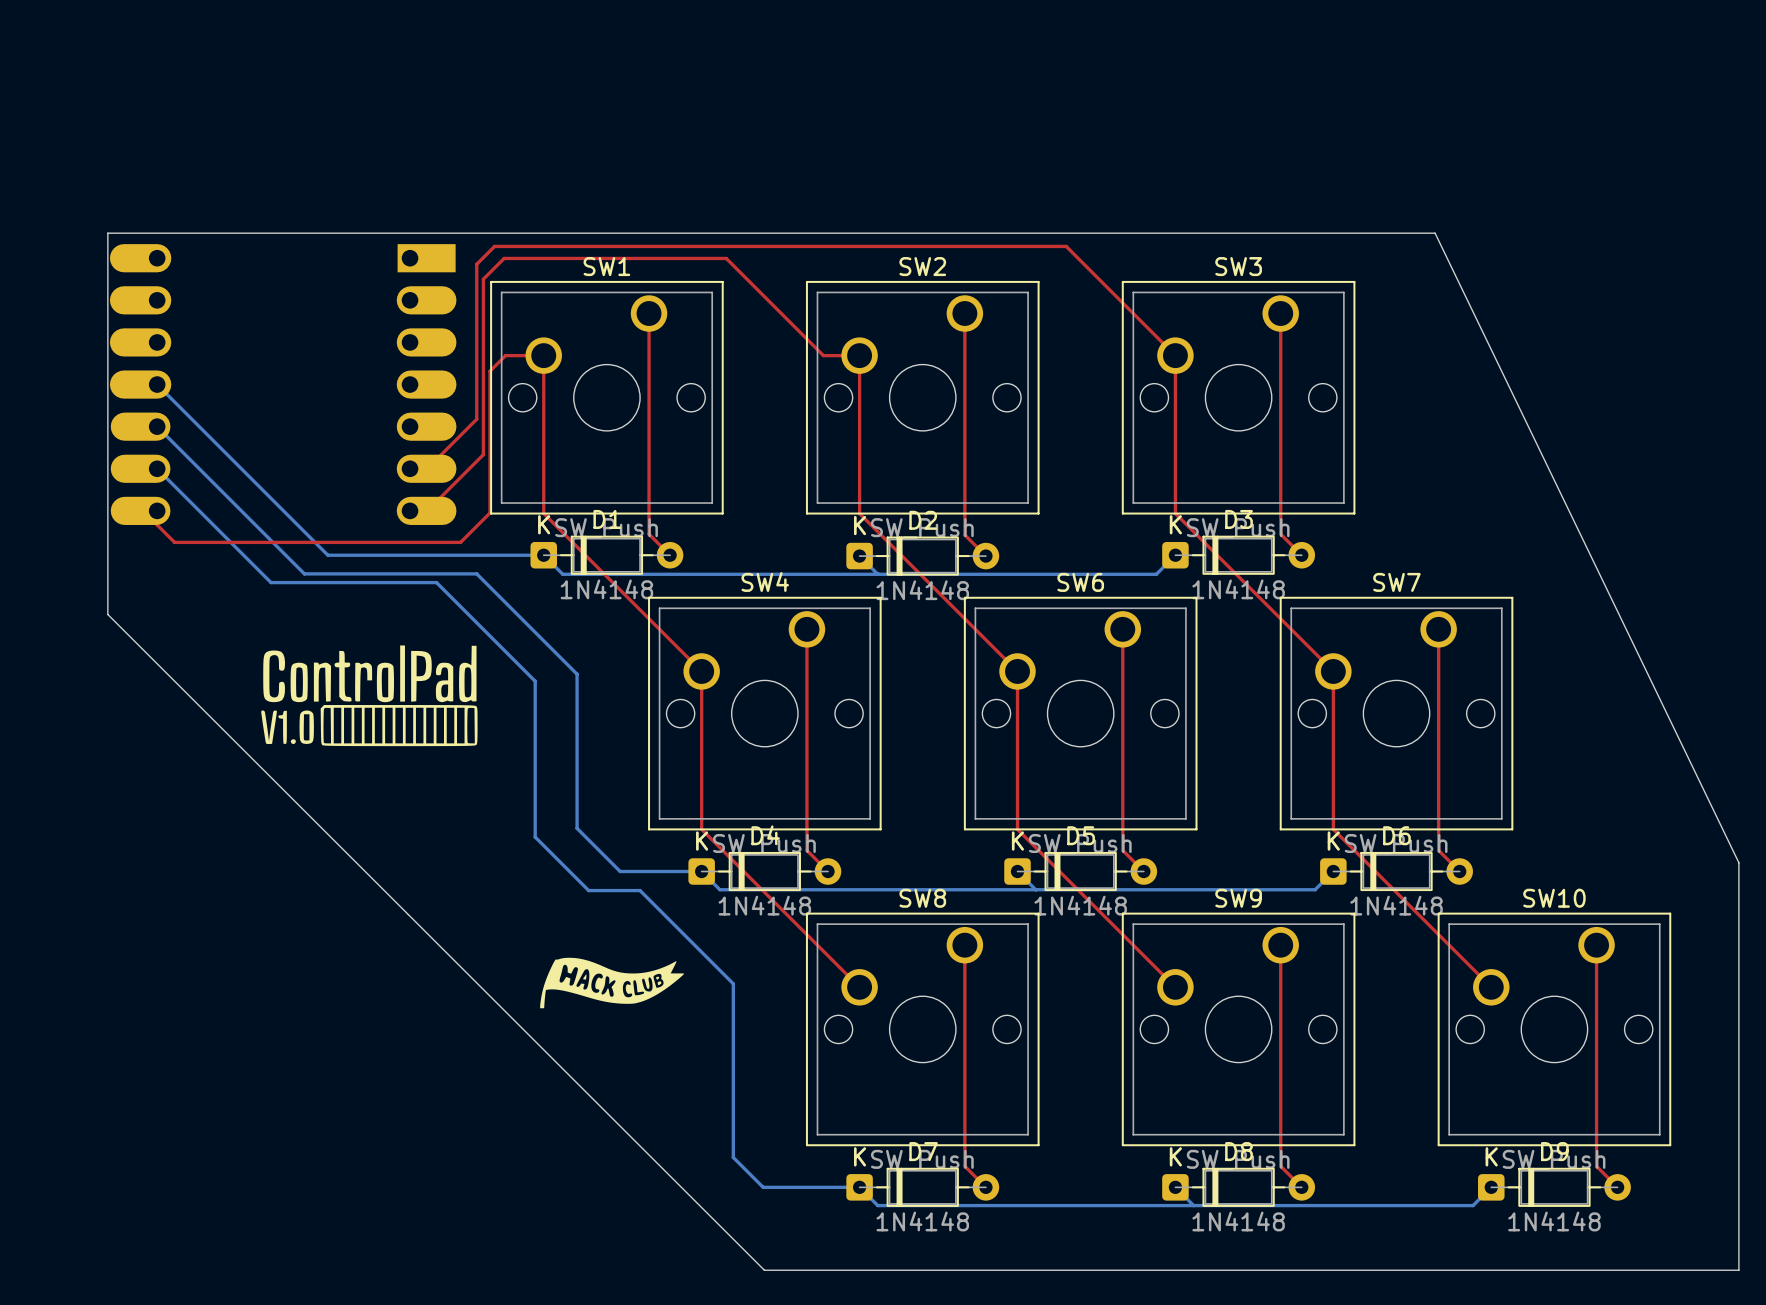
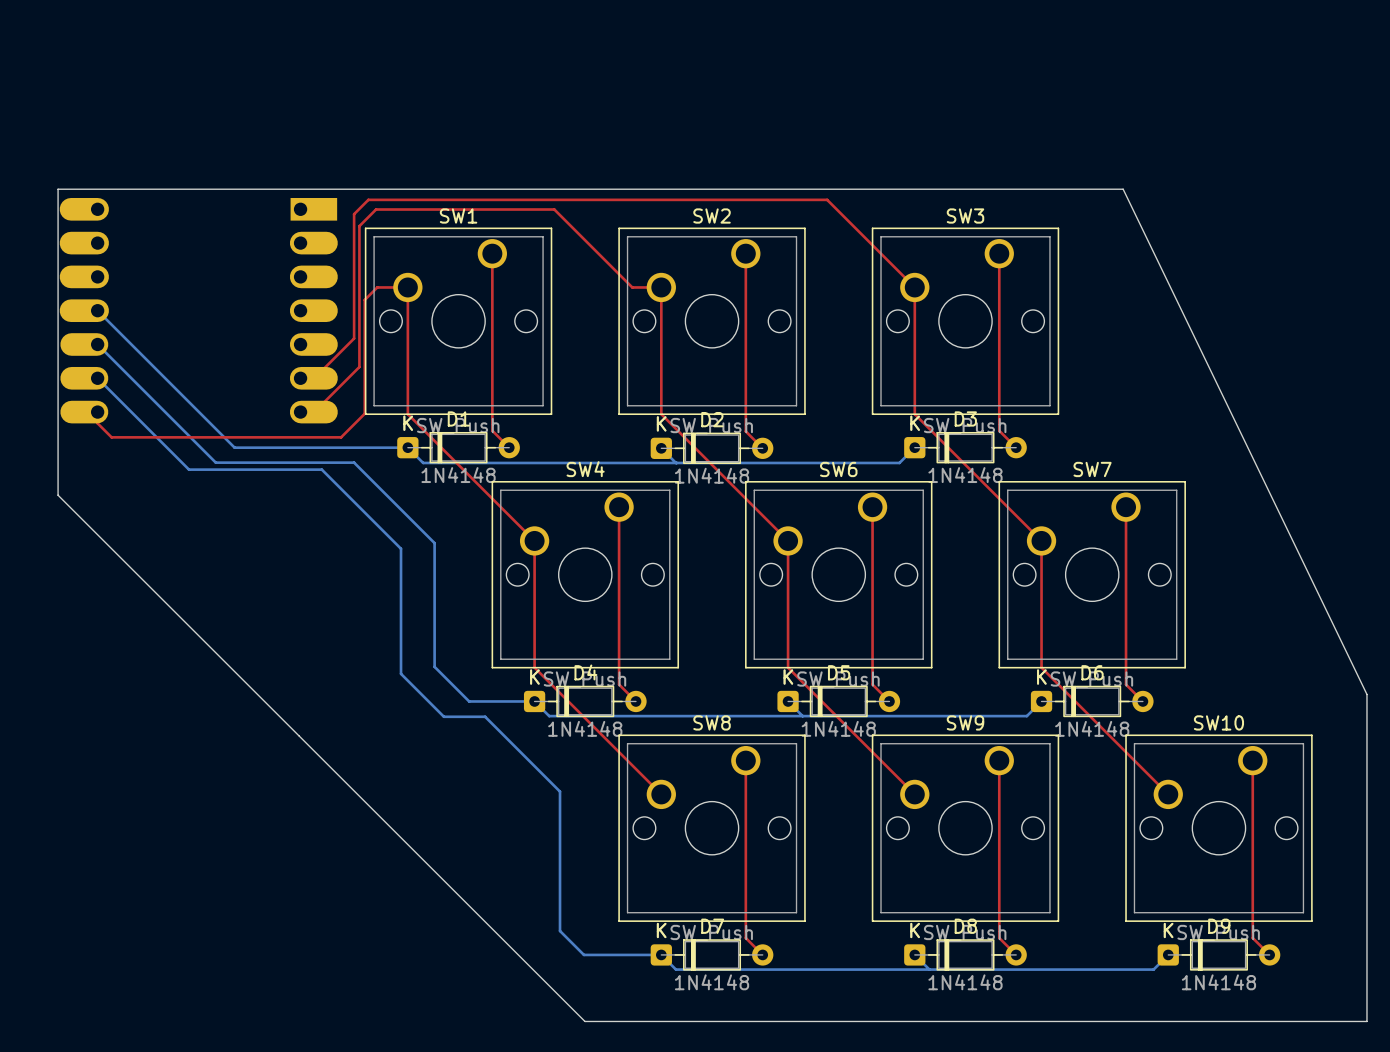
drawing: [261, 645, 478, 747] -> none
drawing: [540, 957, 685, 1009] -> none

